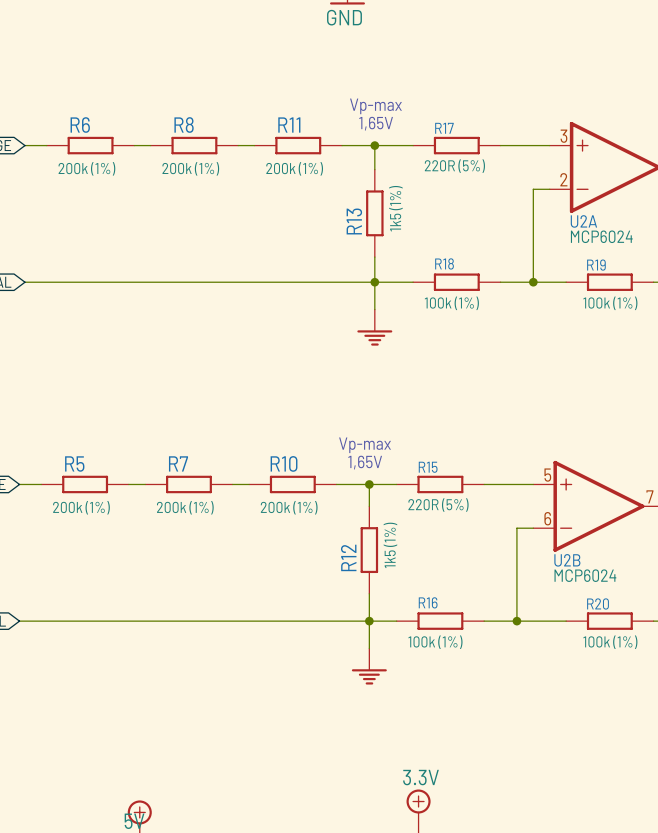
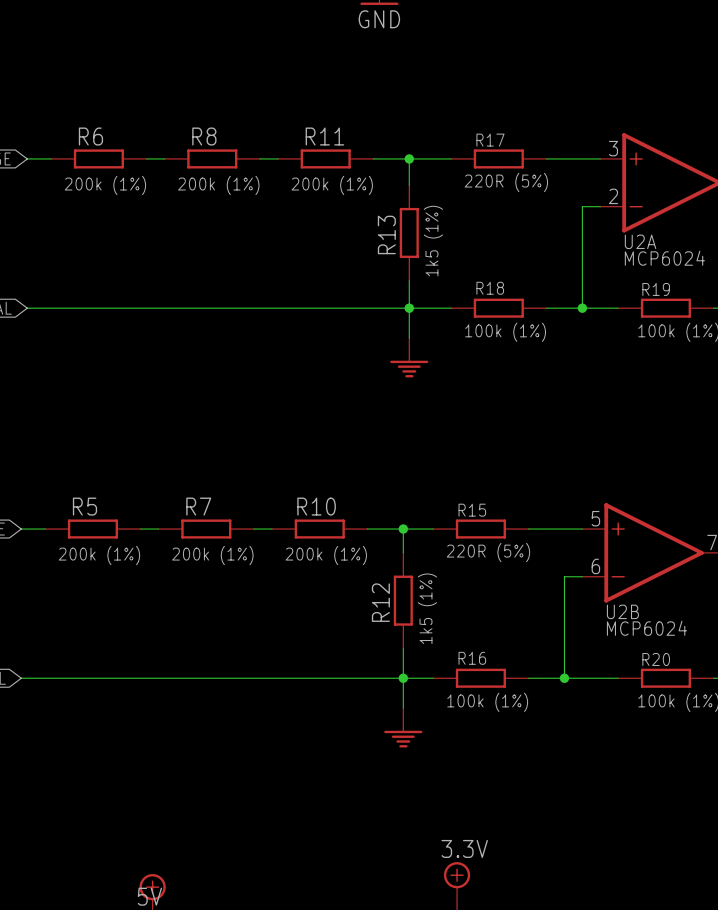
text: Vp-max (375, 106) -> none
text: 1,65V (376, 123) -> none
text: Vp-max (365, 445) -> none
text: 1,65V (365, 462) -> none

